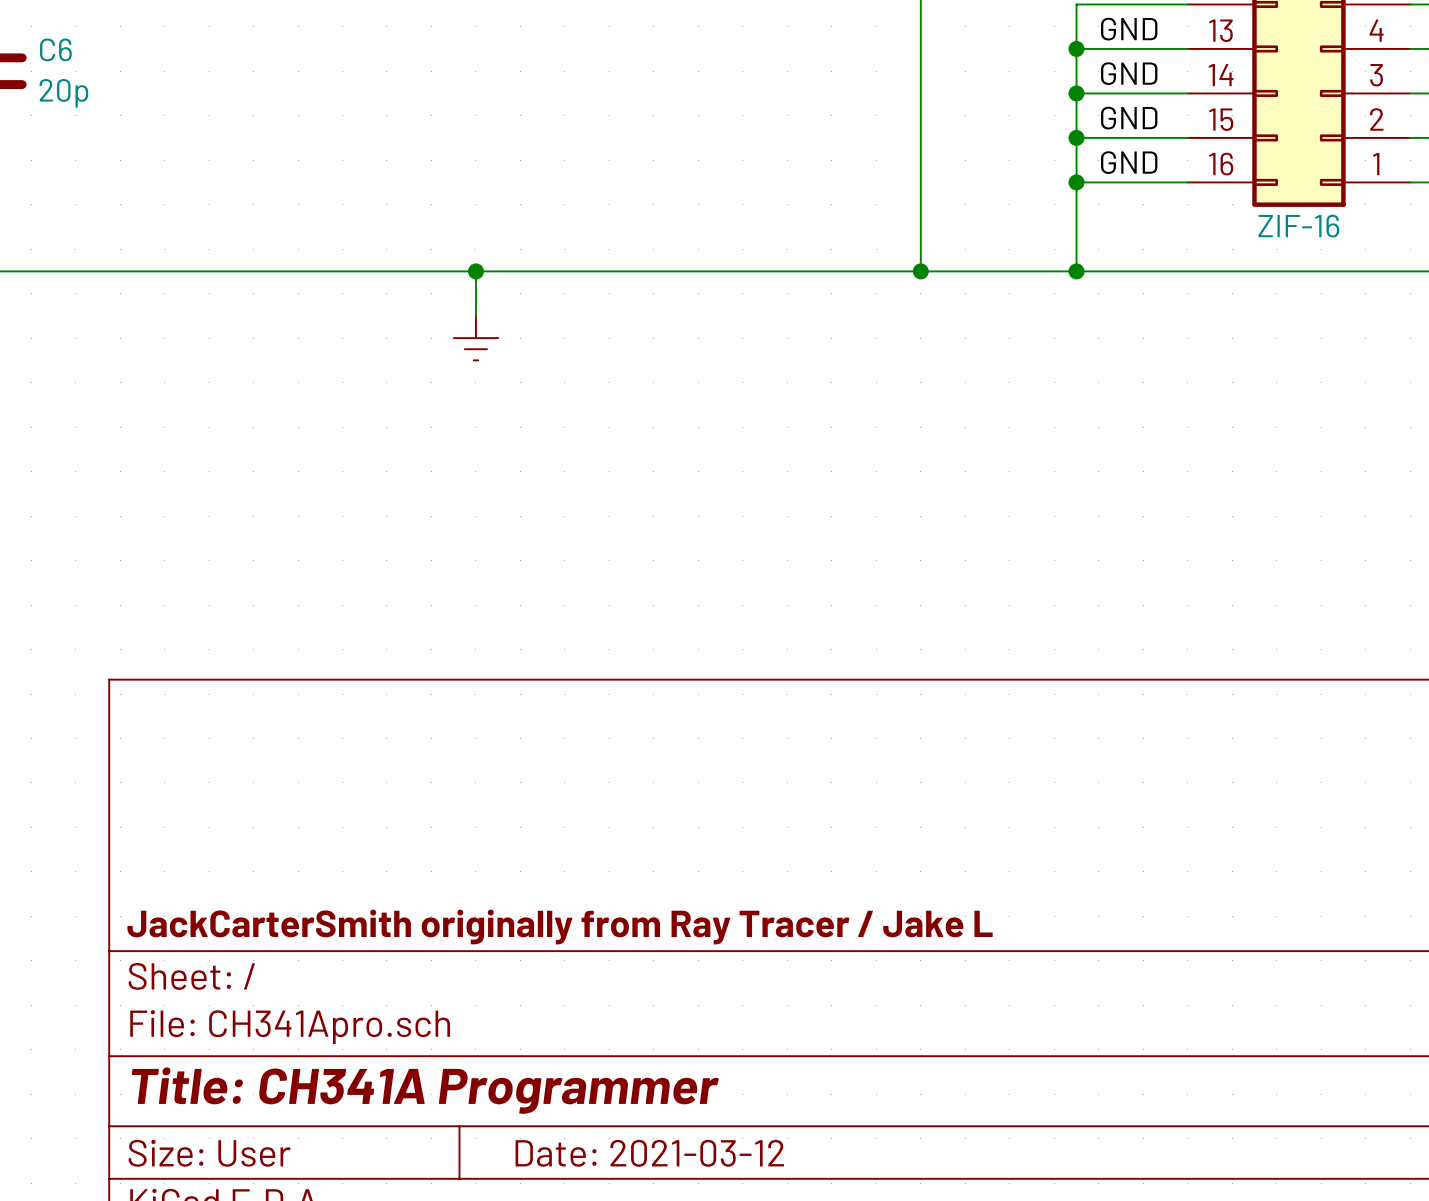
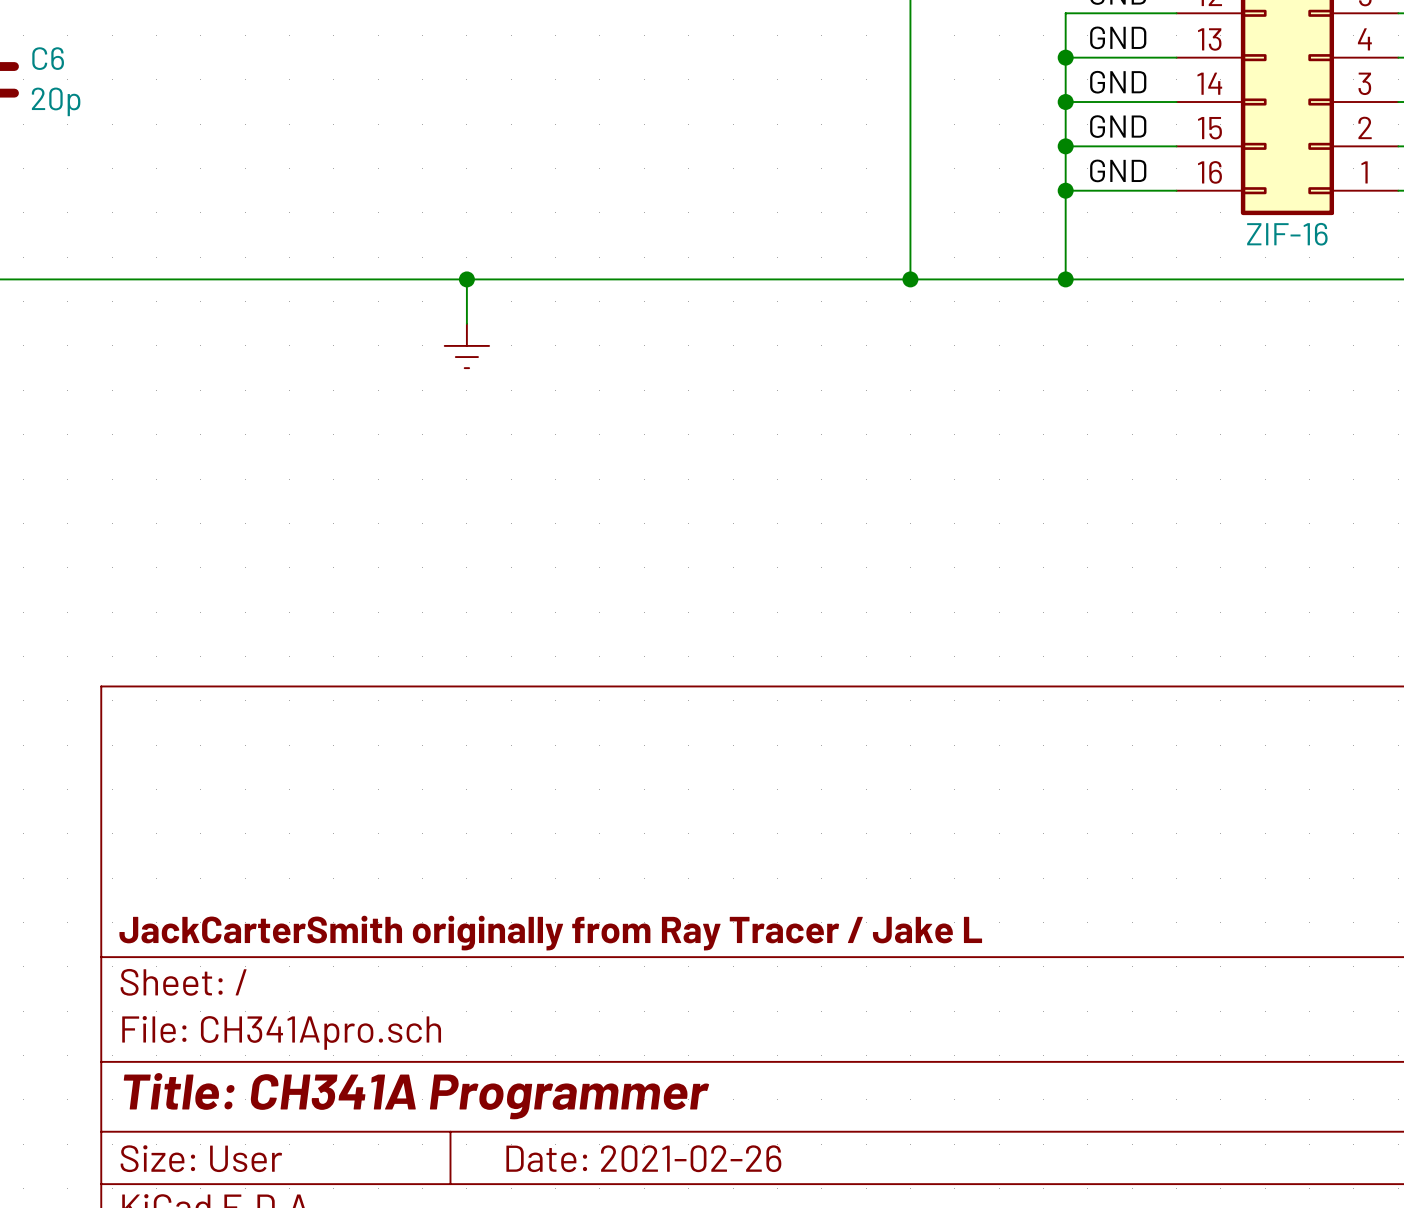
title block: Date: 2021-03-12 (649, 1153) -> Date: 2021-02-26 (643, 1158)

